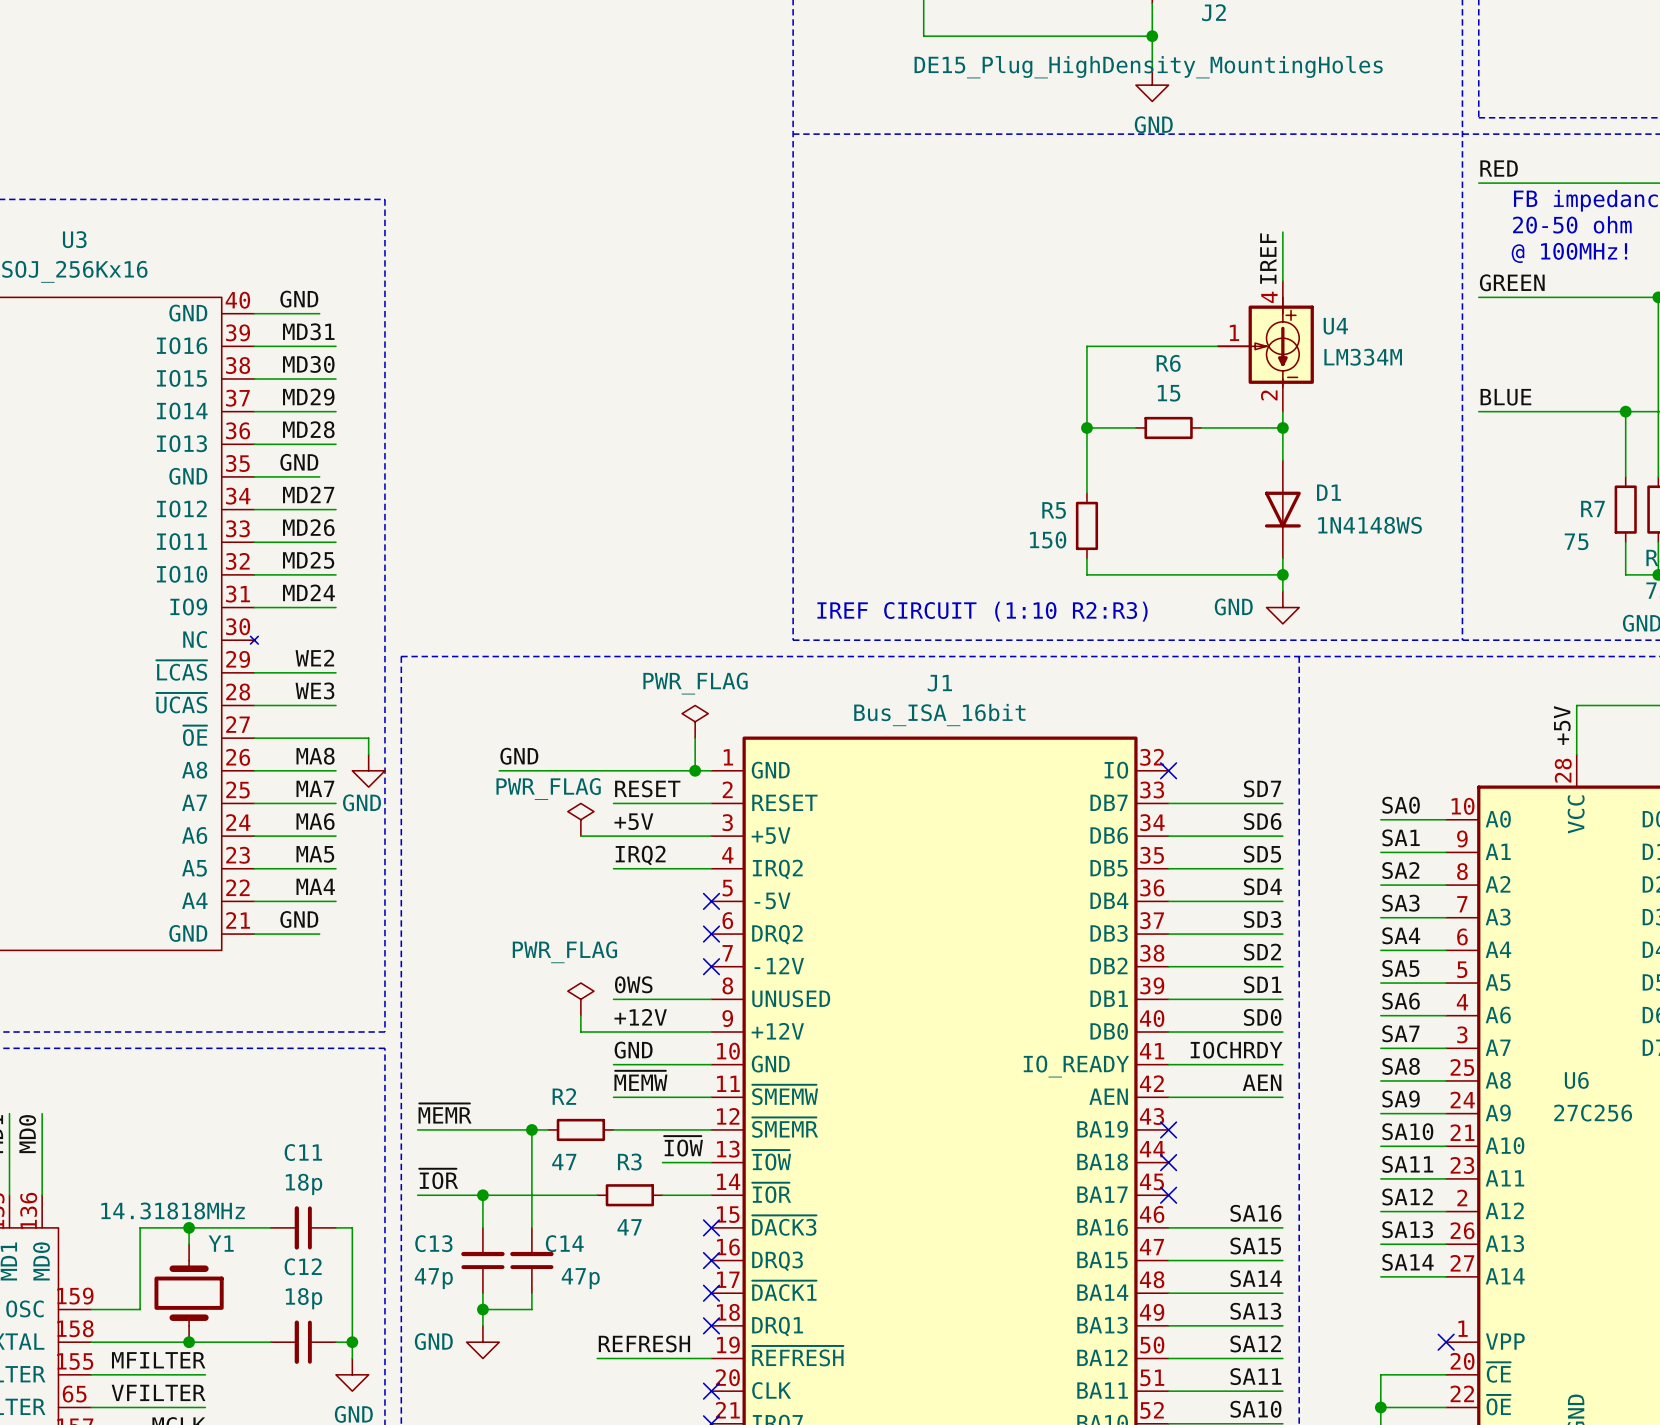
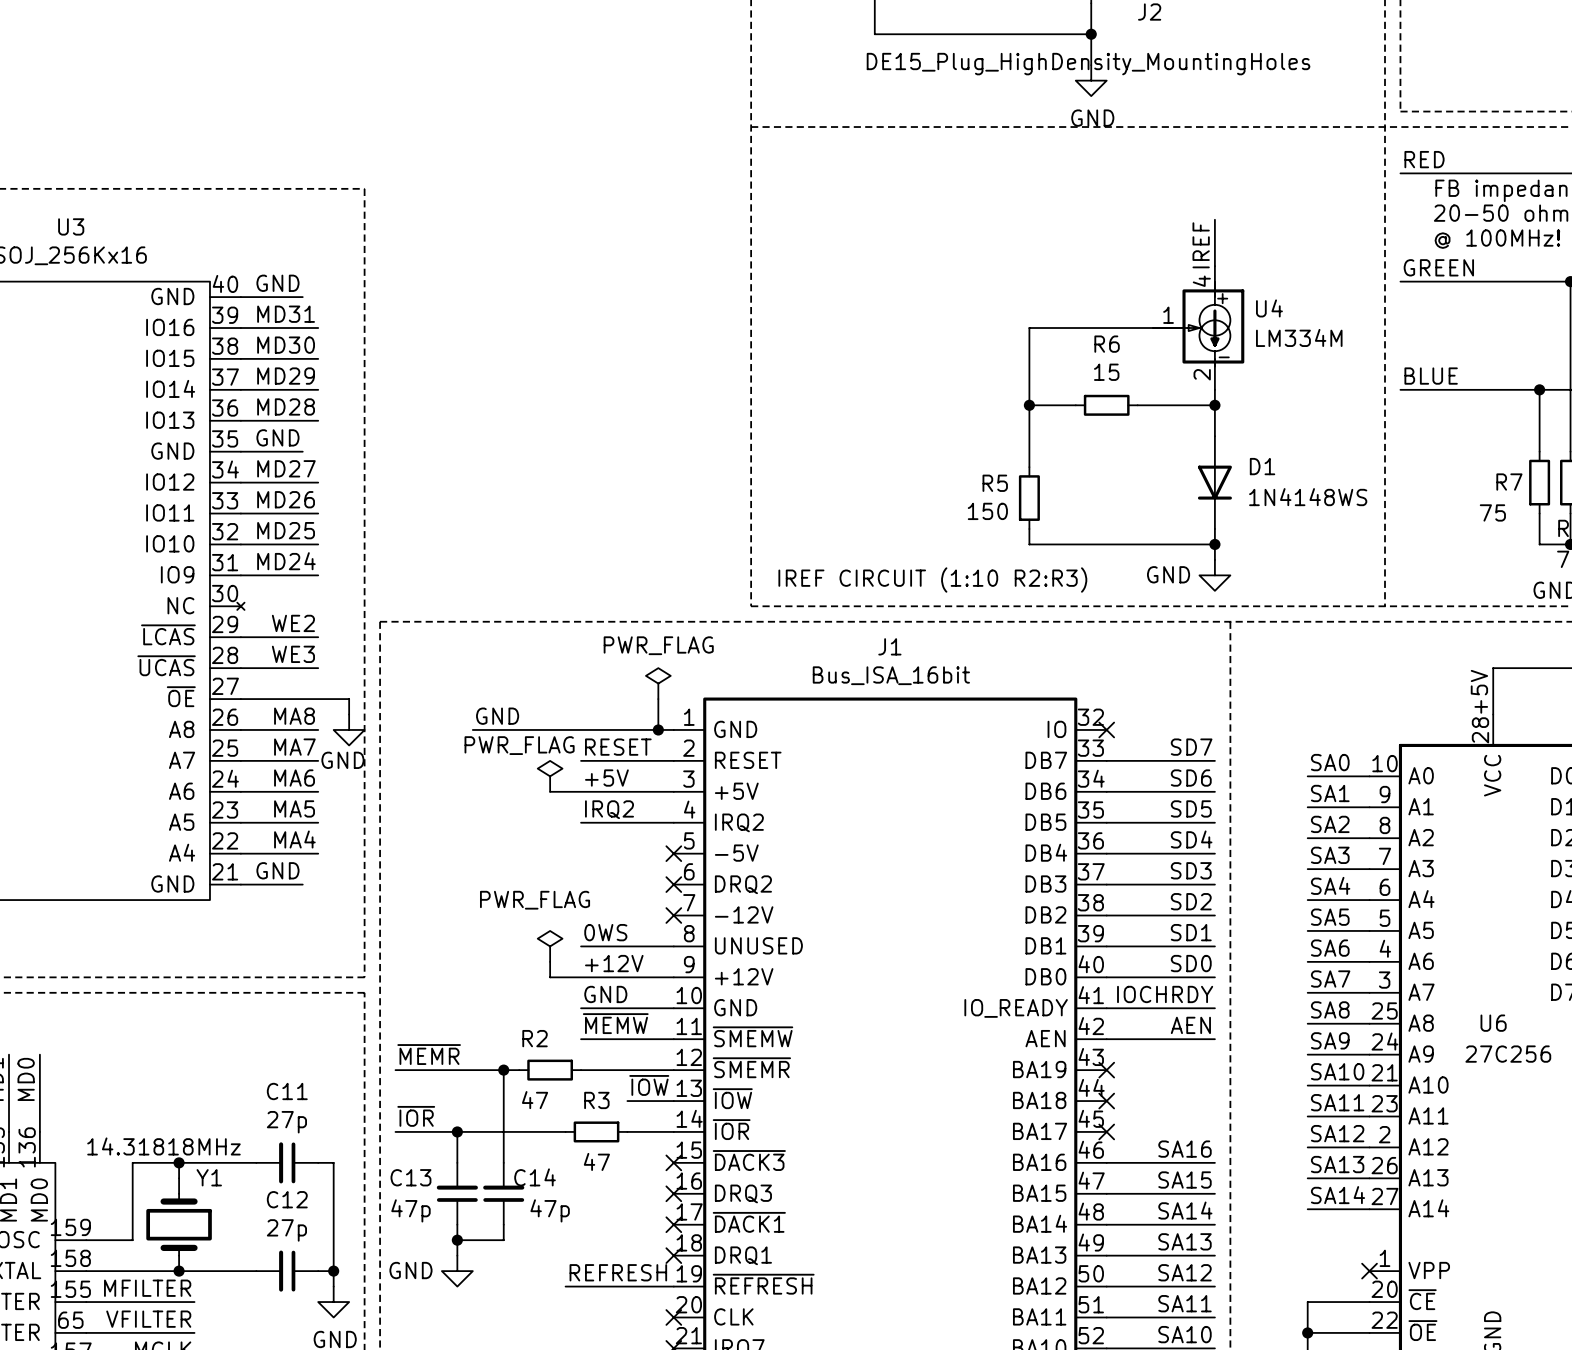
C11 value: 18p (304, 1184) -> 27p (286, 1122)
C12 value: 18p (304, 1298) -> 27p (286, 1230)

